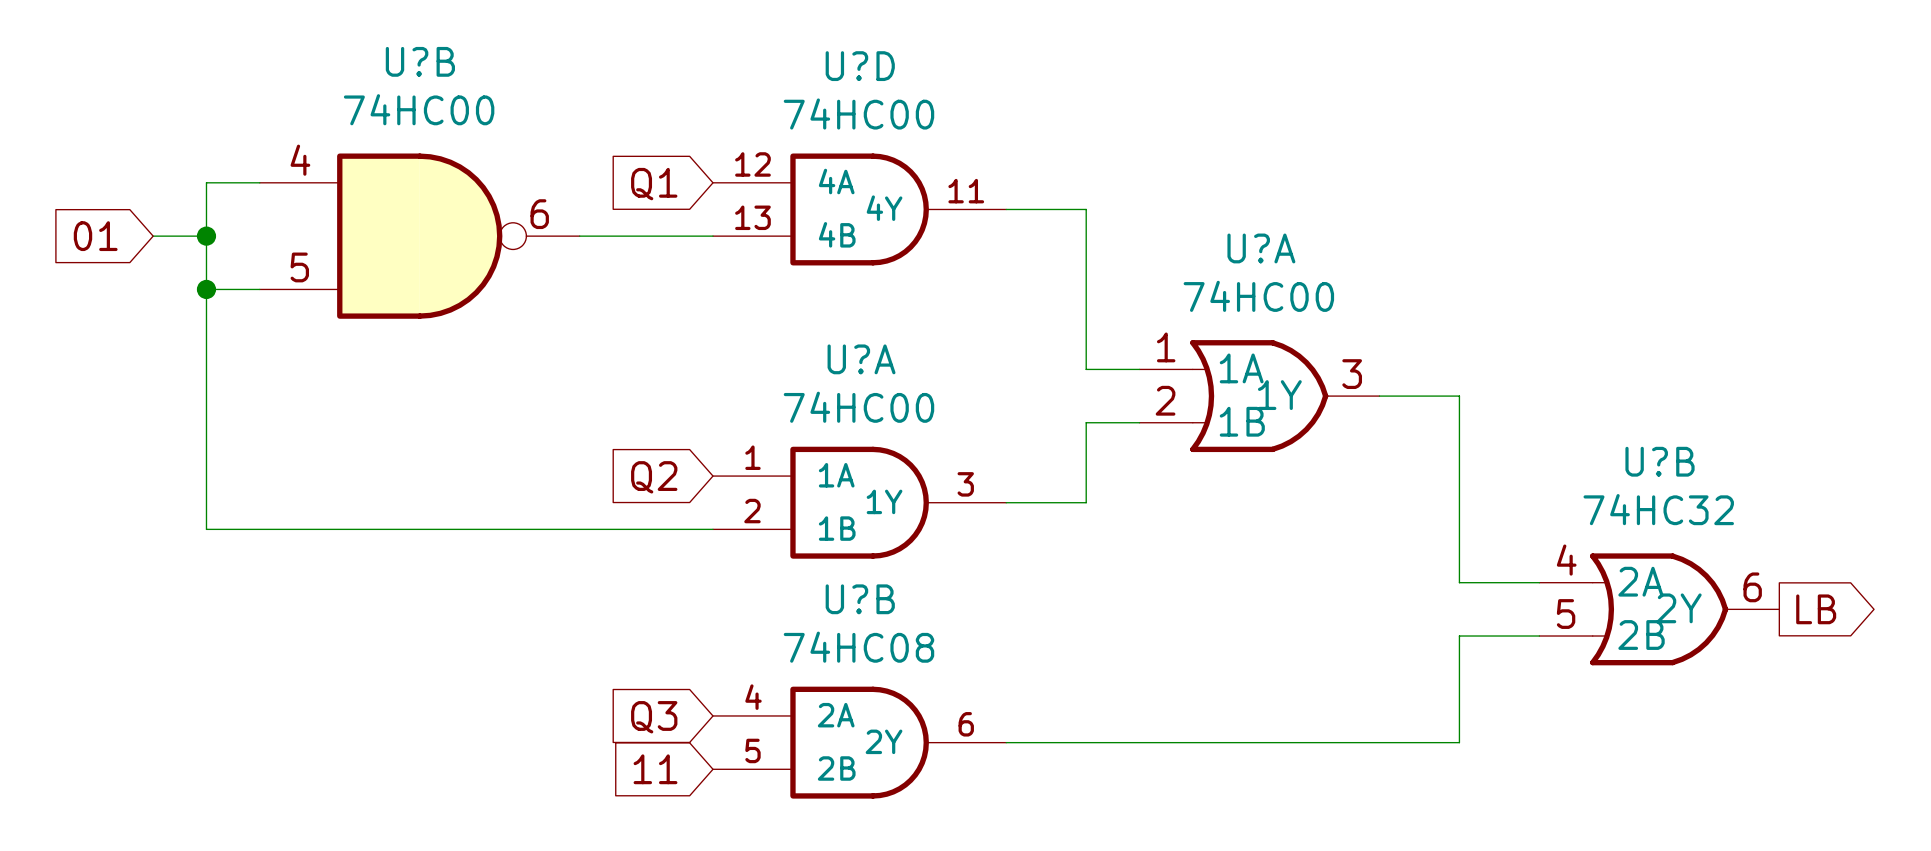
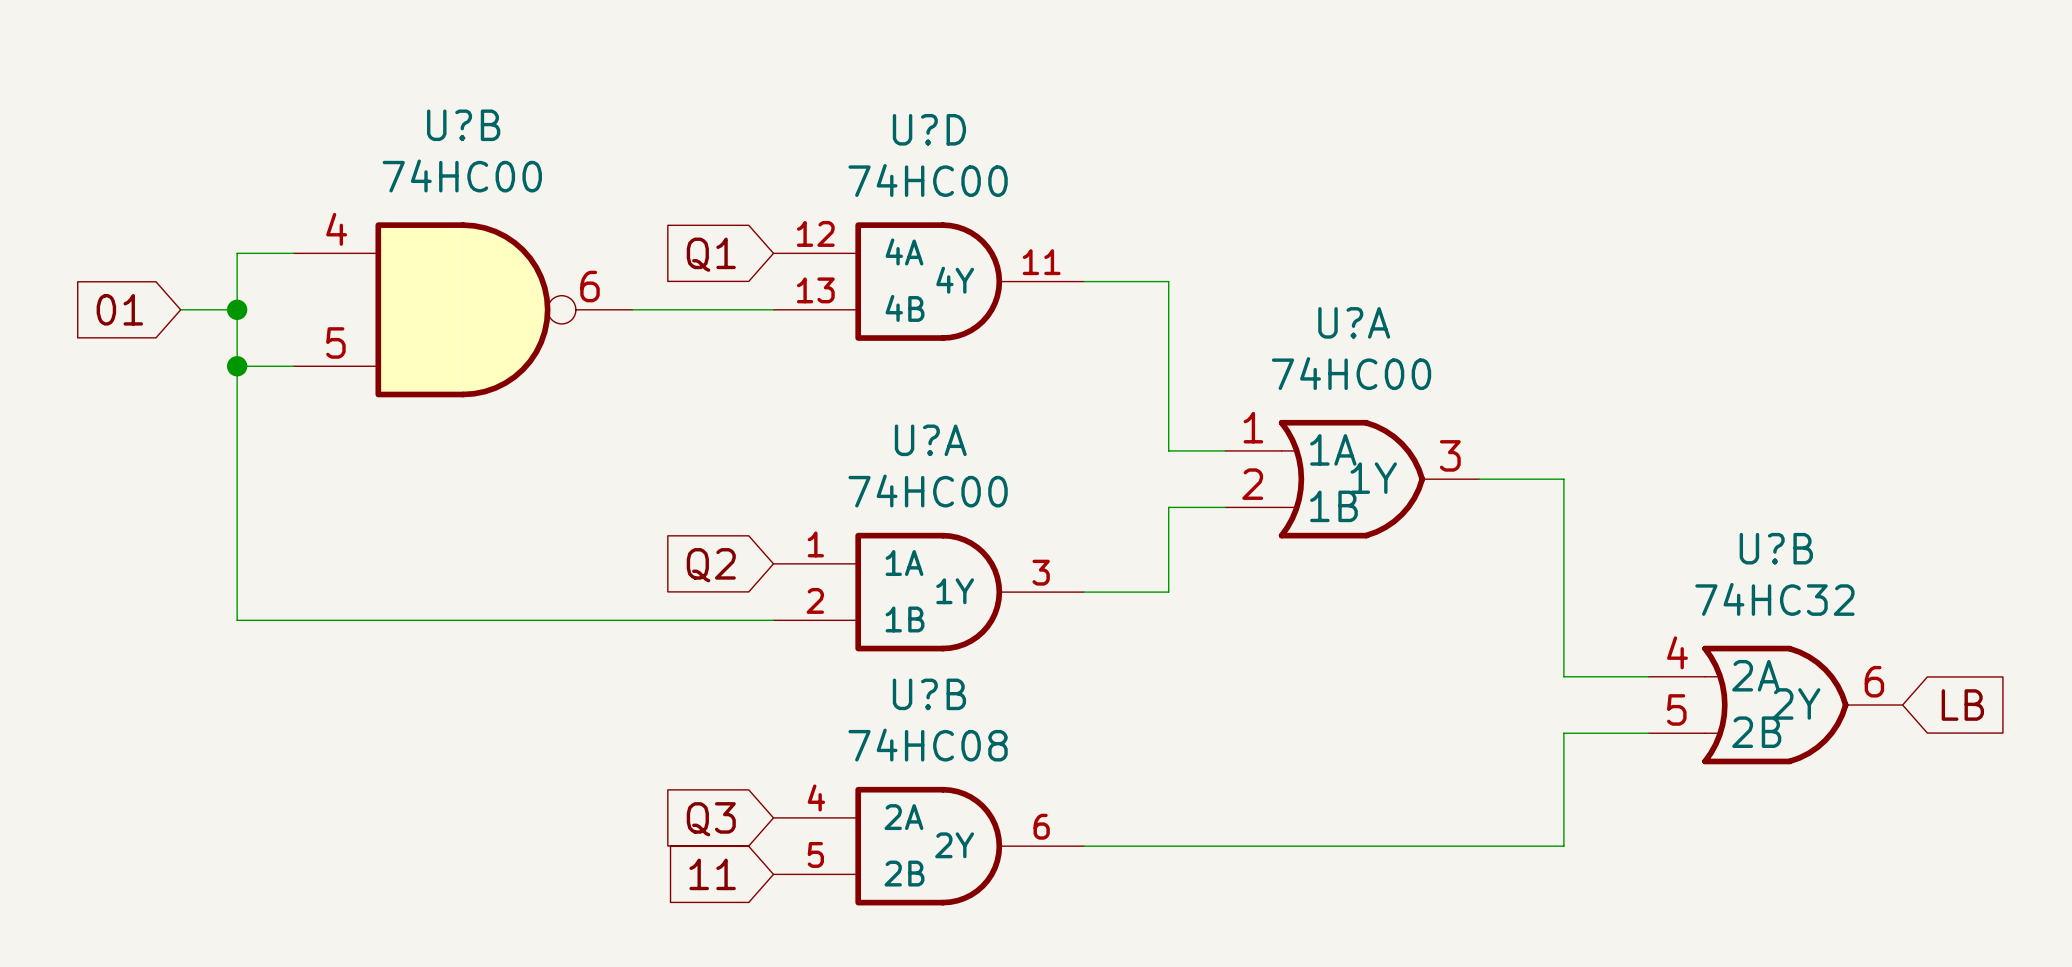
global label shape: output (1816, 609) -> input (1962, 705)

